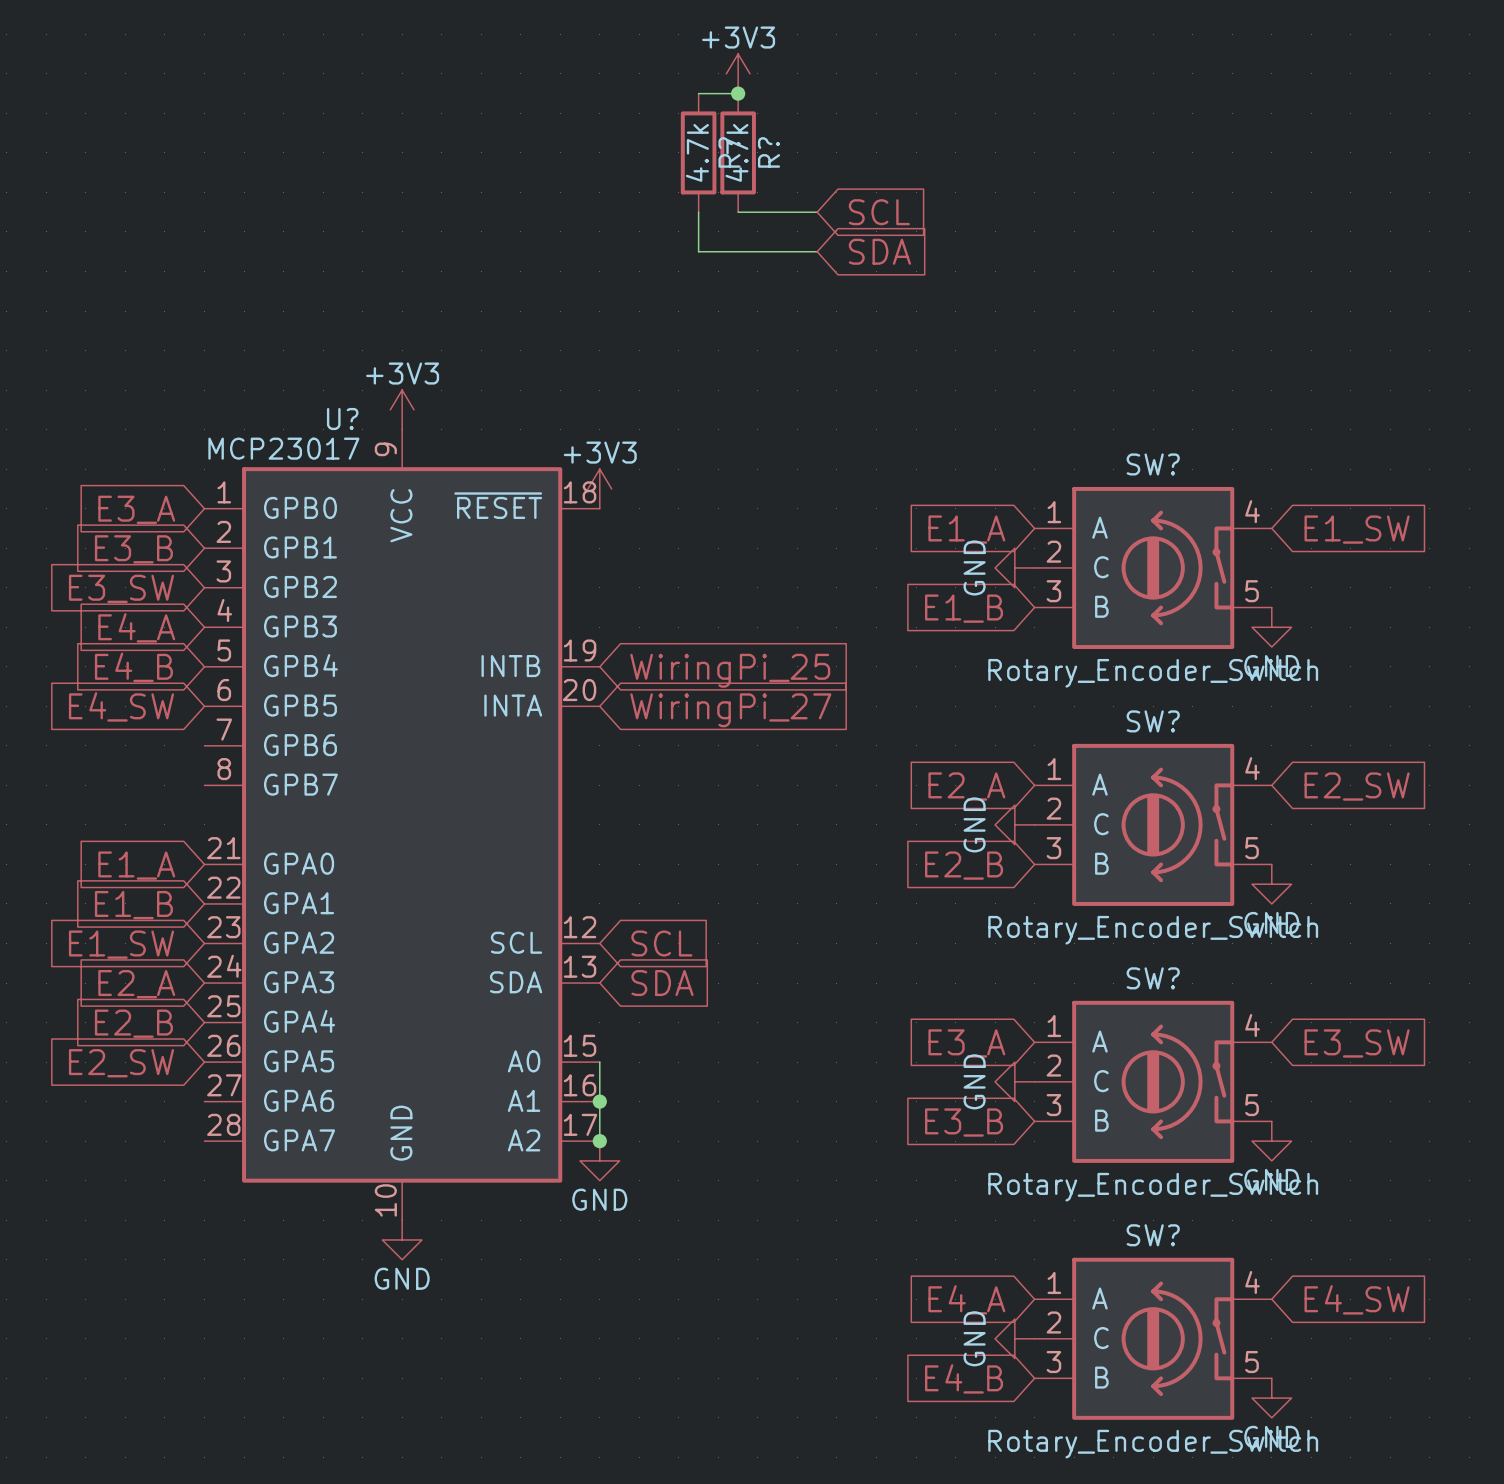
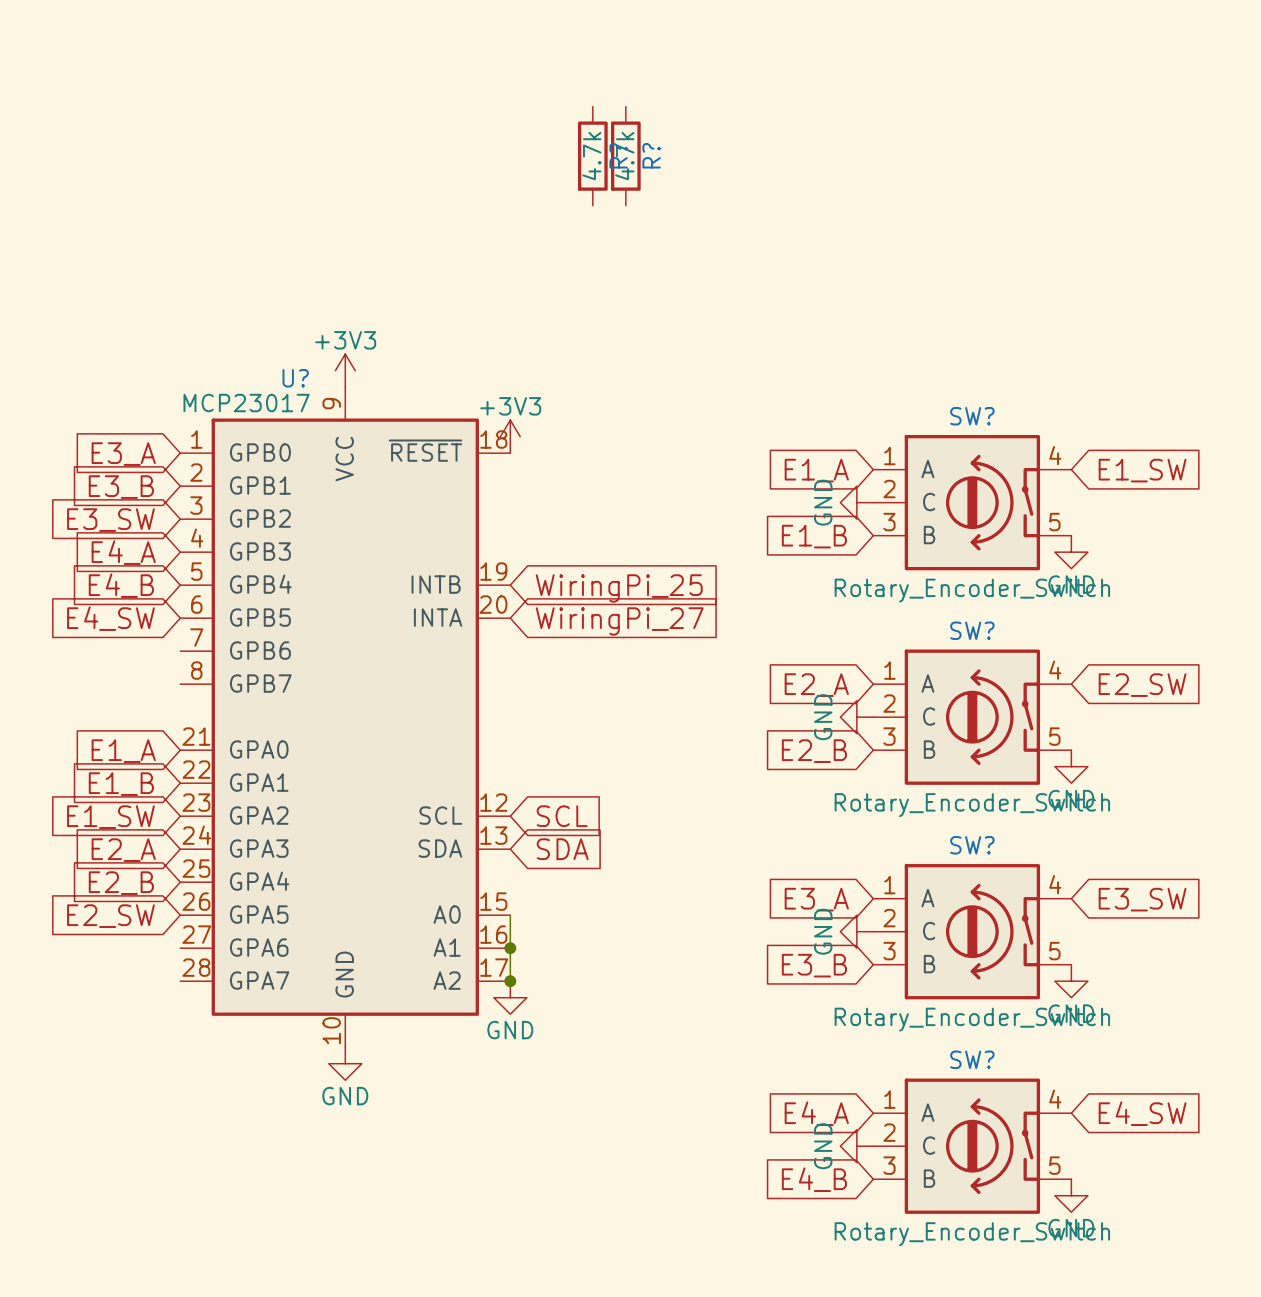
power symbol: +3V3 (738, 73) -> none
wire: (698, 93) (738, 93) -> none
junction: (738, 93) -> none
wire: (698, 212) (698, 251) (817, 251) -> none
wire: (738, 212) (817, 212) -> none
global label: SCL (879, 212) -> none
global label: SDA (879, 251) -> none

